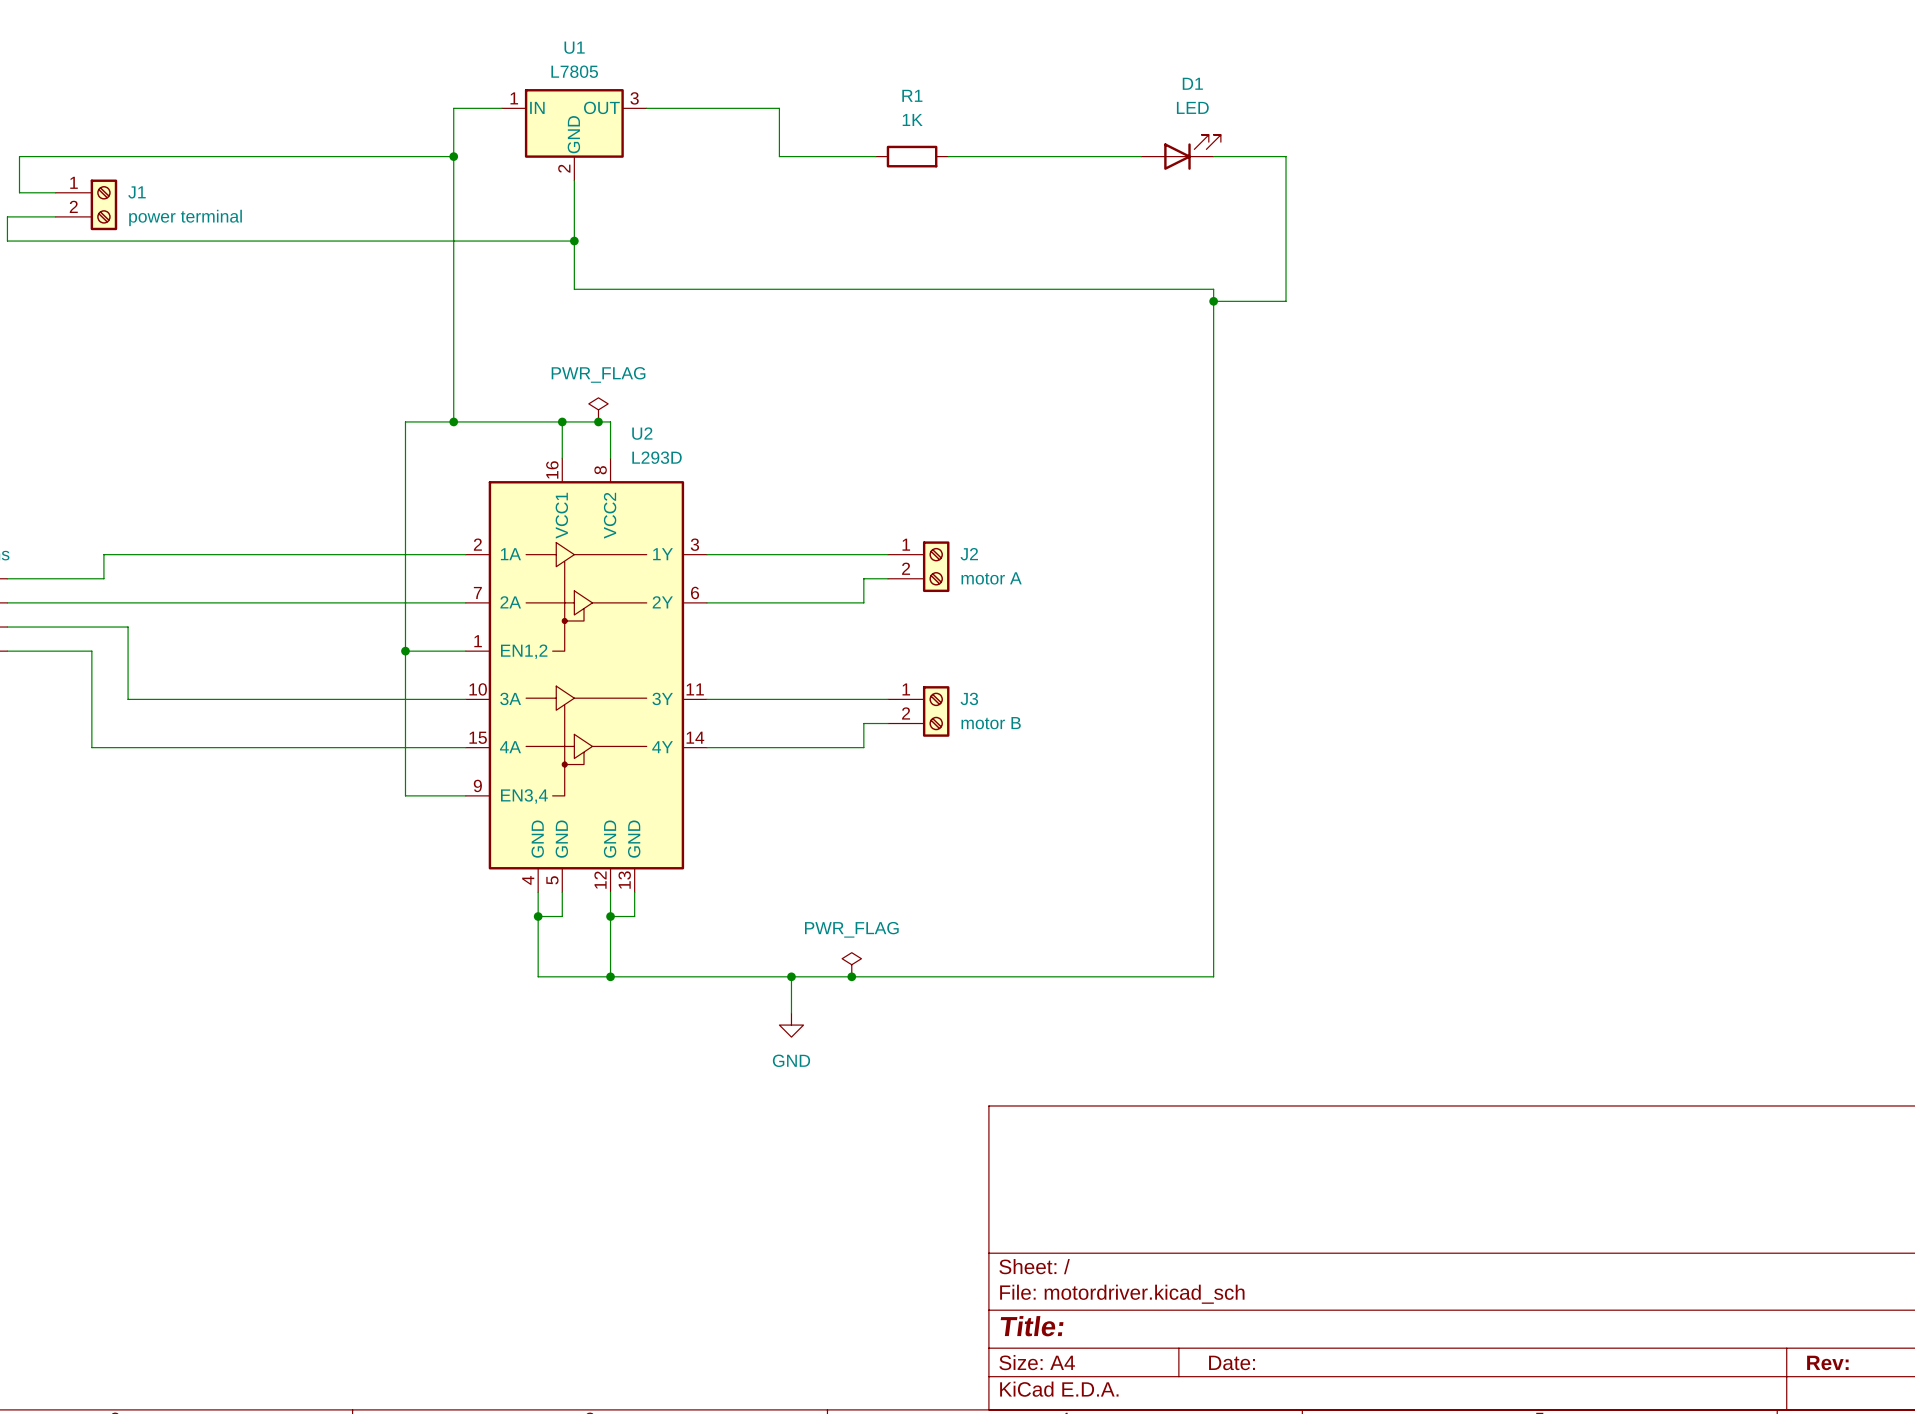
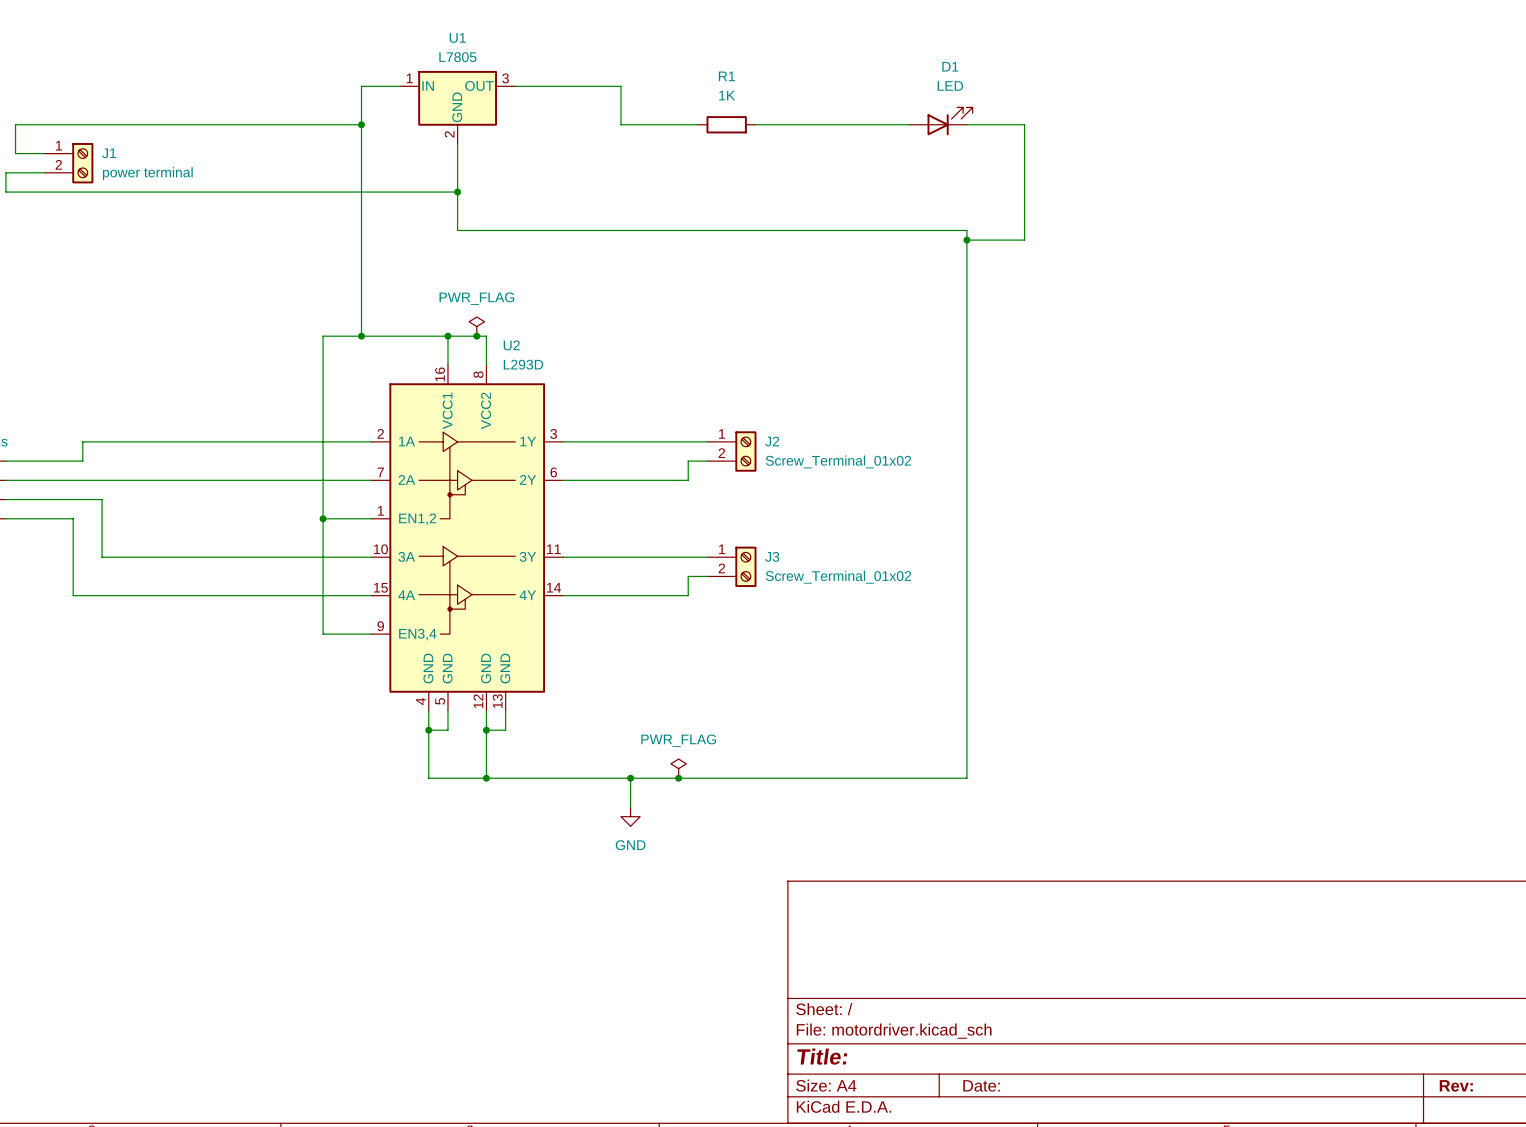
J2 value: motor A (991, 578) -> Screw_Terminal_01x02 (838, 461)
J3 value: motor B (991, 723) -> Screw_Terminal_01x02 (838, 577)

